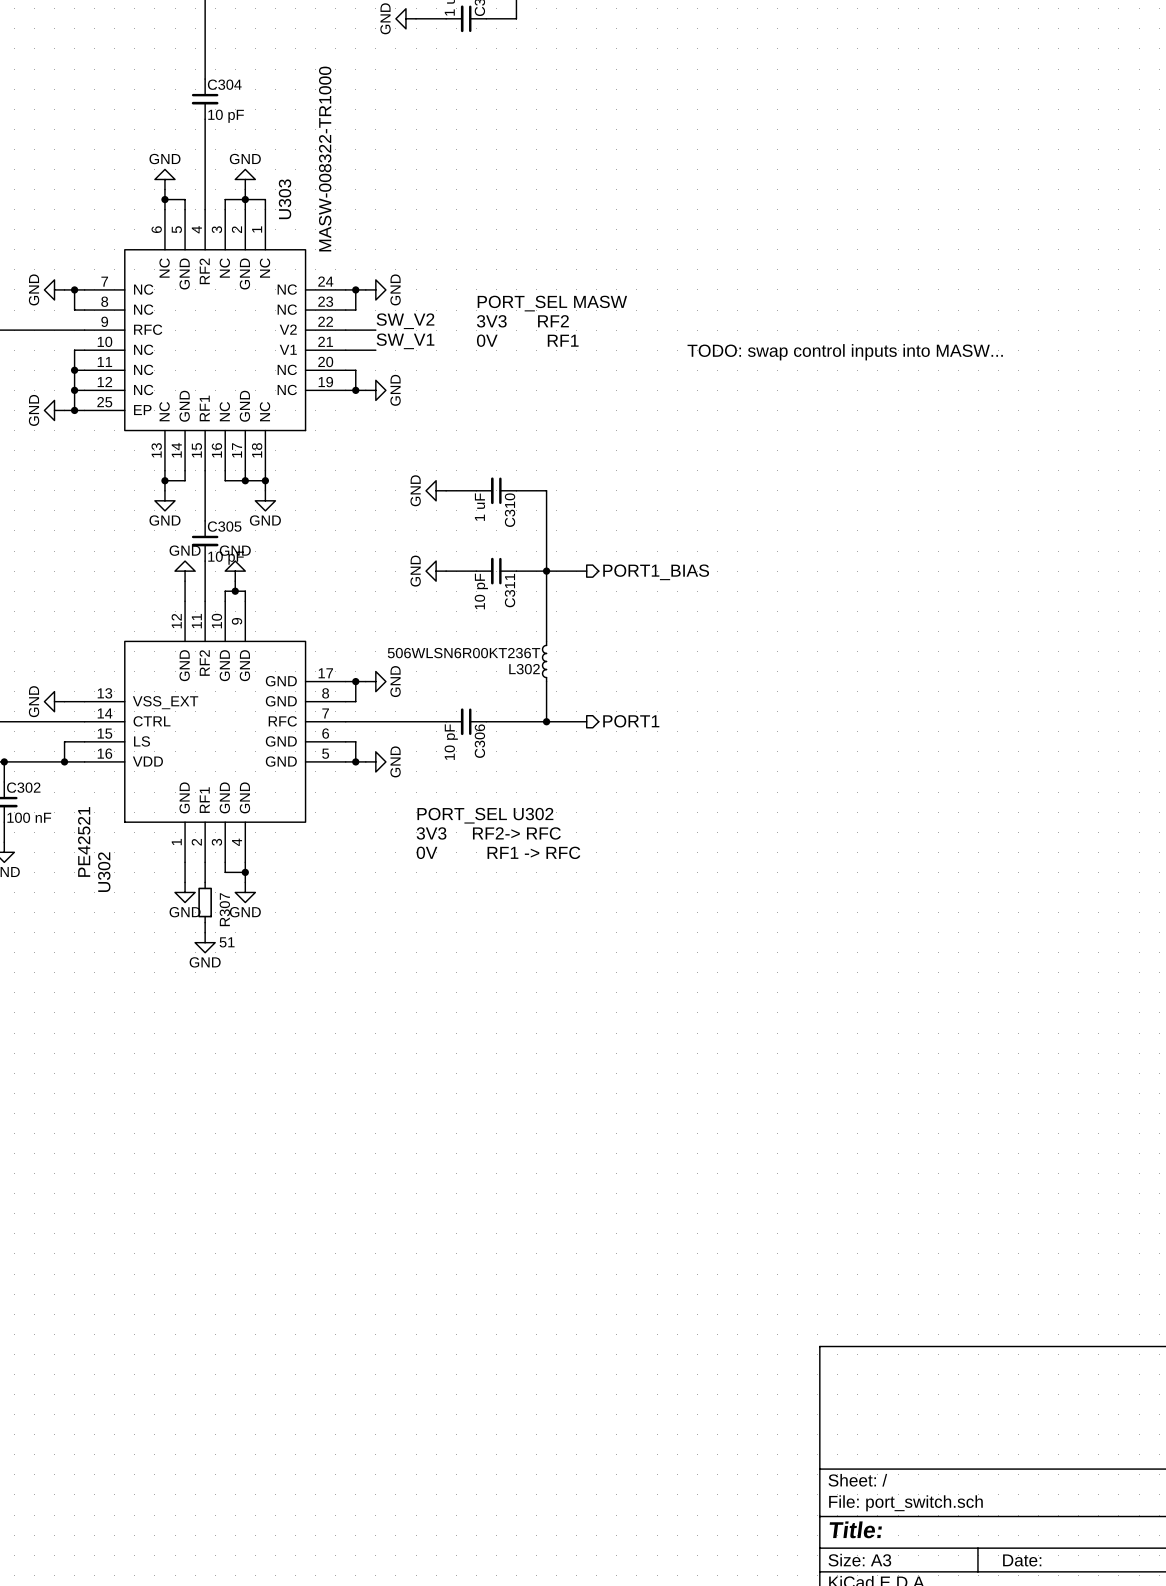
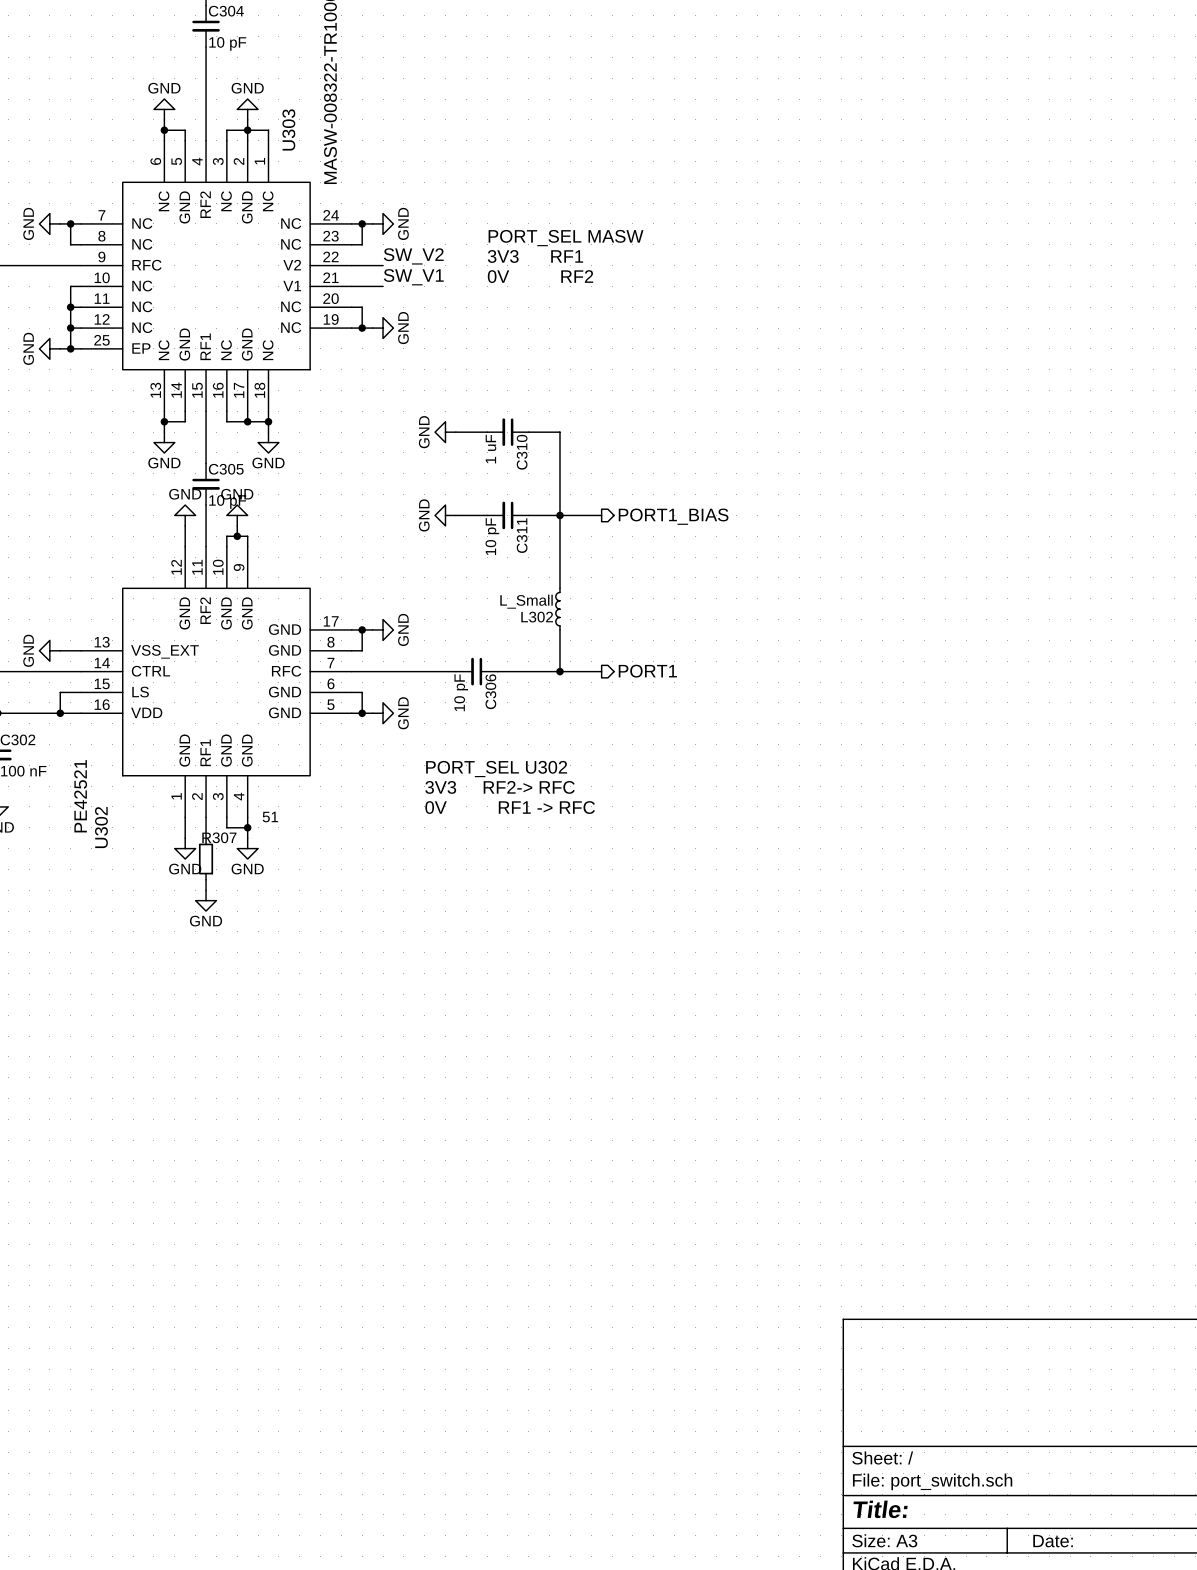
text: 3V3 RF2 (522, 321) -> 3V3 RF1 (535, 256)
text: 0V RF1 (527, 340) -> 0V RF2 (540, 276)
text: TODO: swap control inputs into MASW... (845, 352) -> none
L302 value: 506WLSN6R00KT236T (463, 653) -> L_Small (526, 601)
R307 name rotation: 0° (224, 909) -> 90° clockwise (219, 837)
R307 value position: 51 (227, 942) -> 51 (270, 817)

